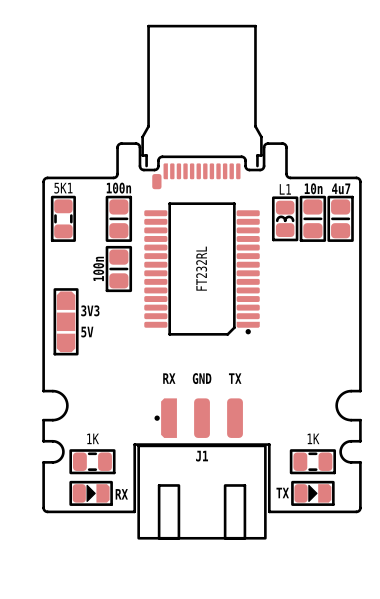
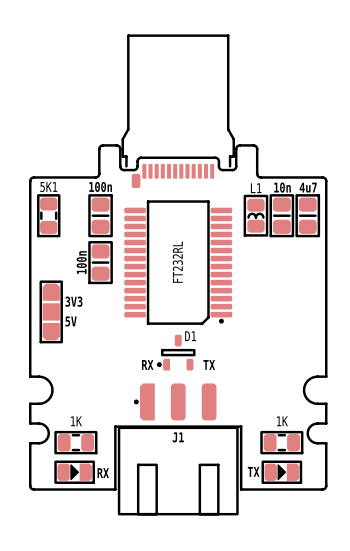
D1: none -> (176, 352)
text: GND (202, 378) -> none

